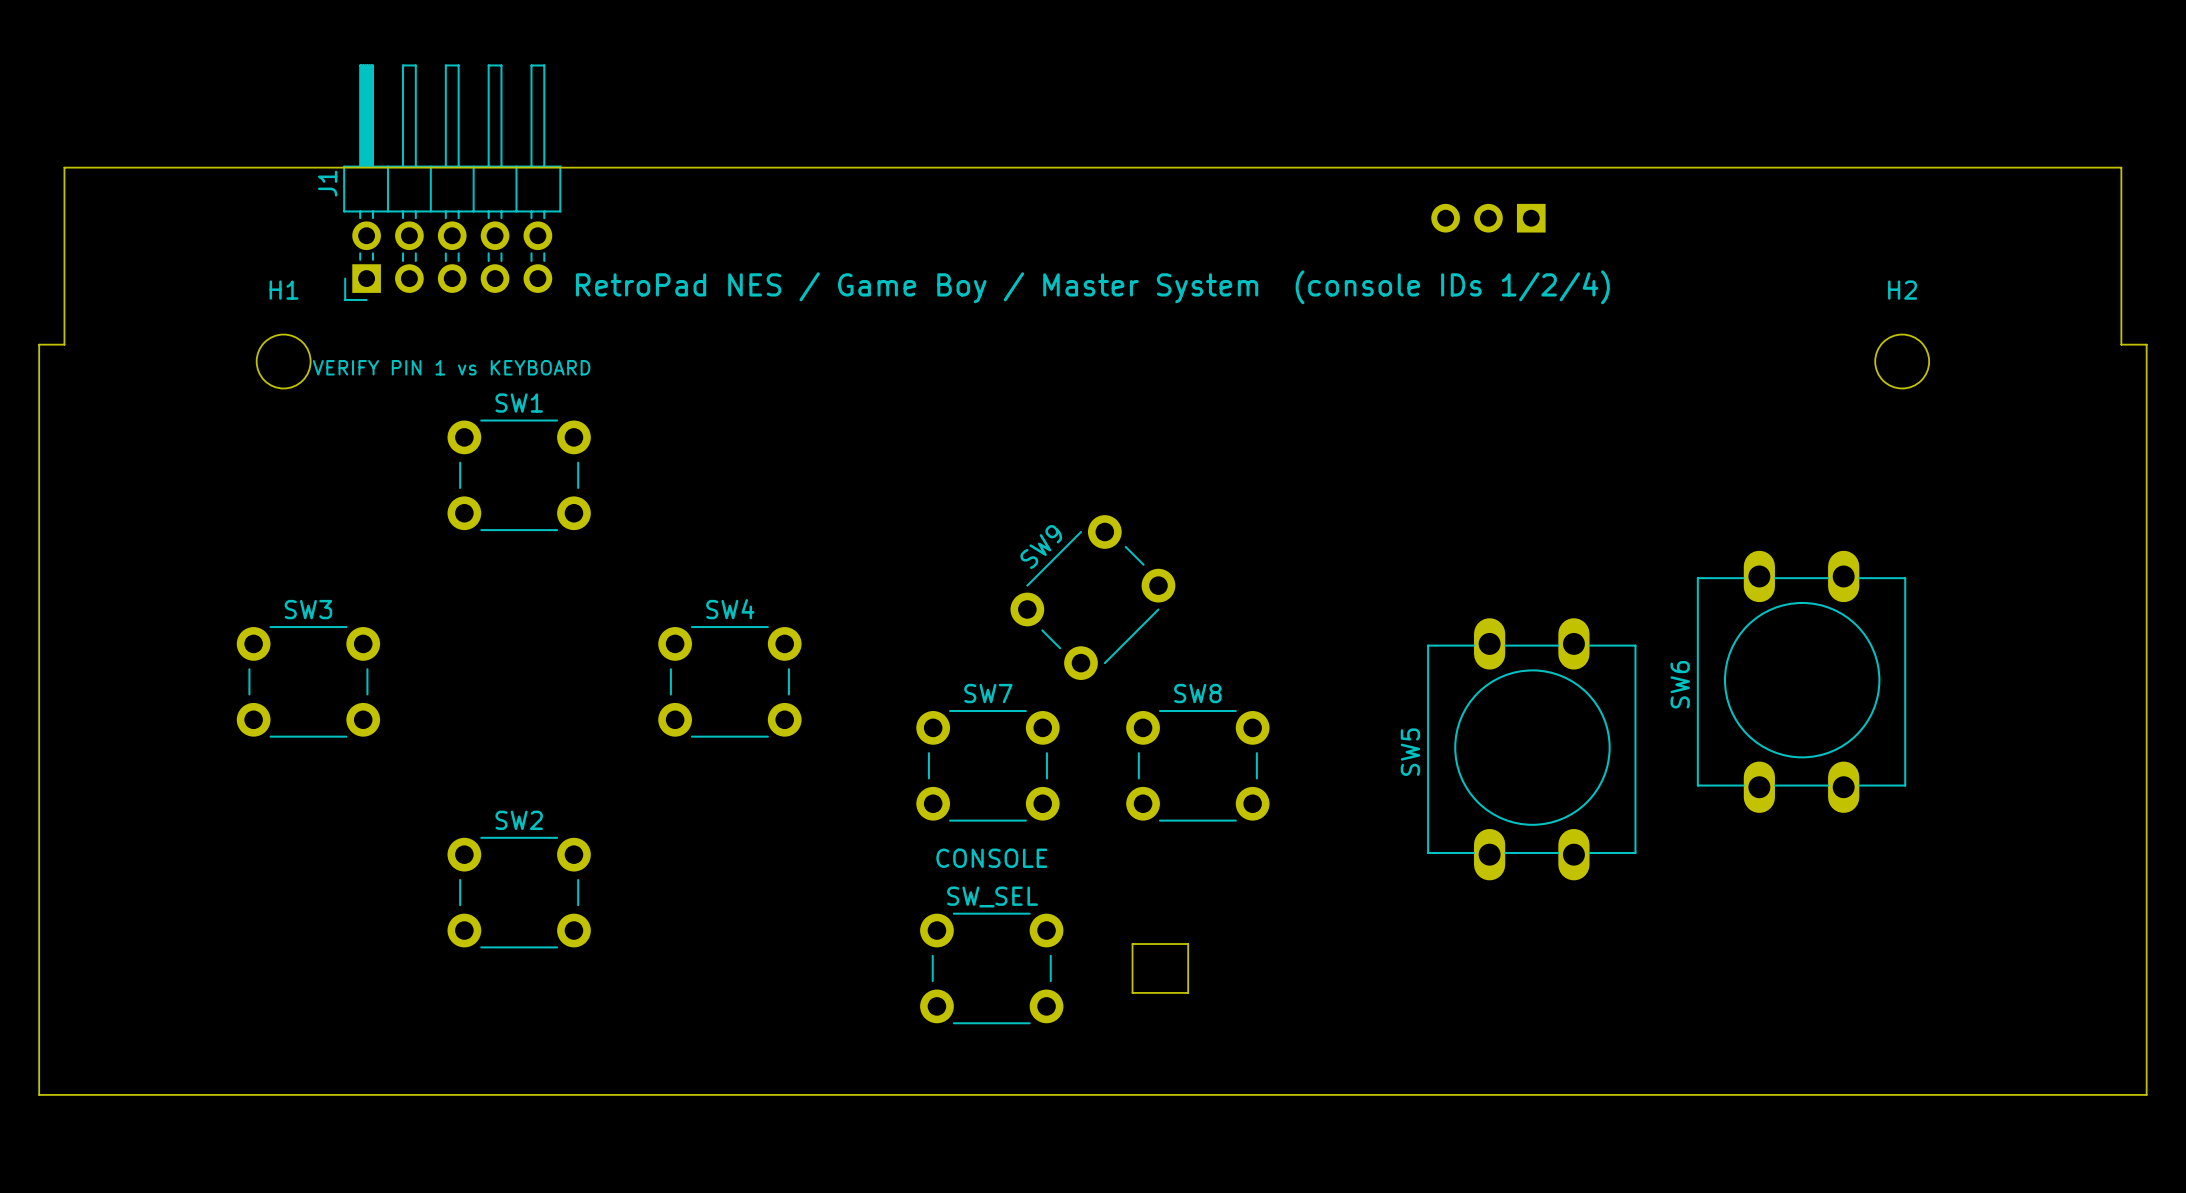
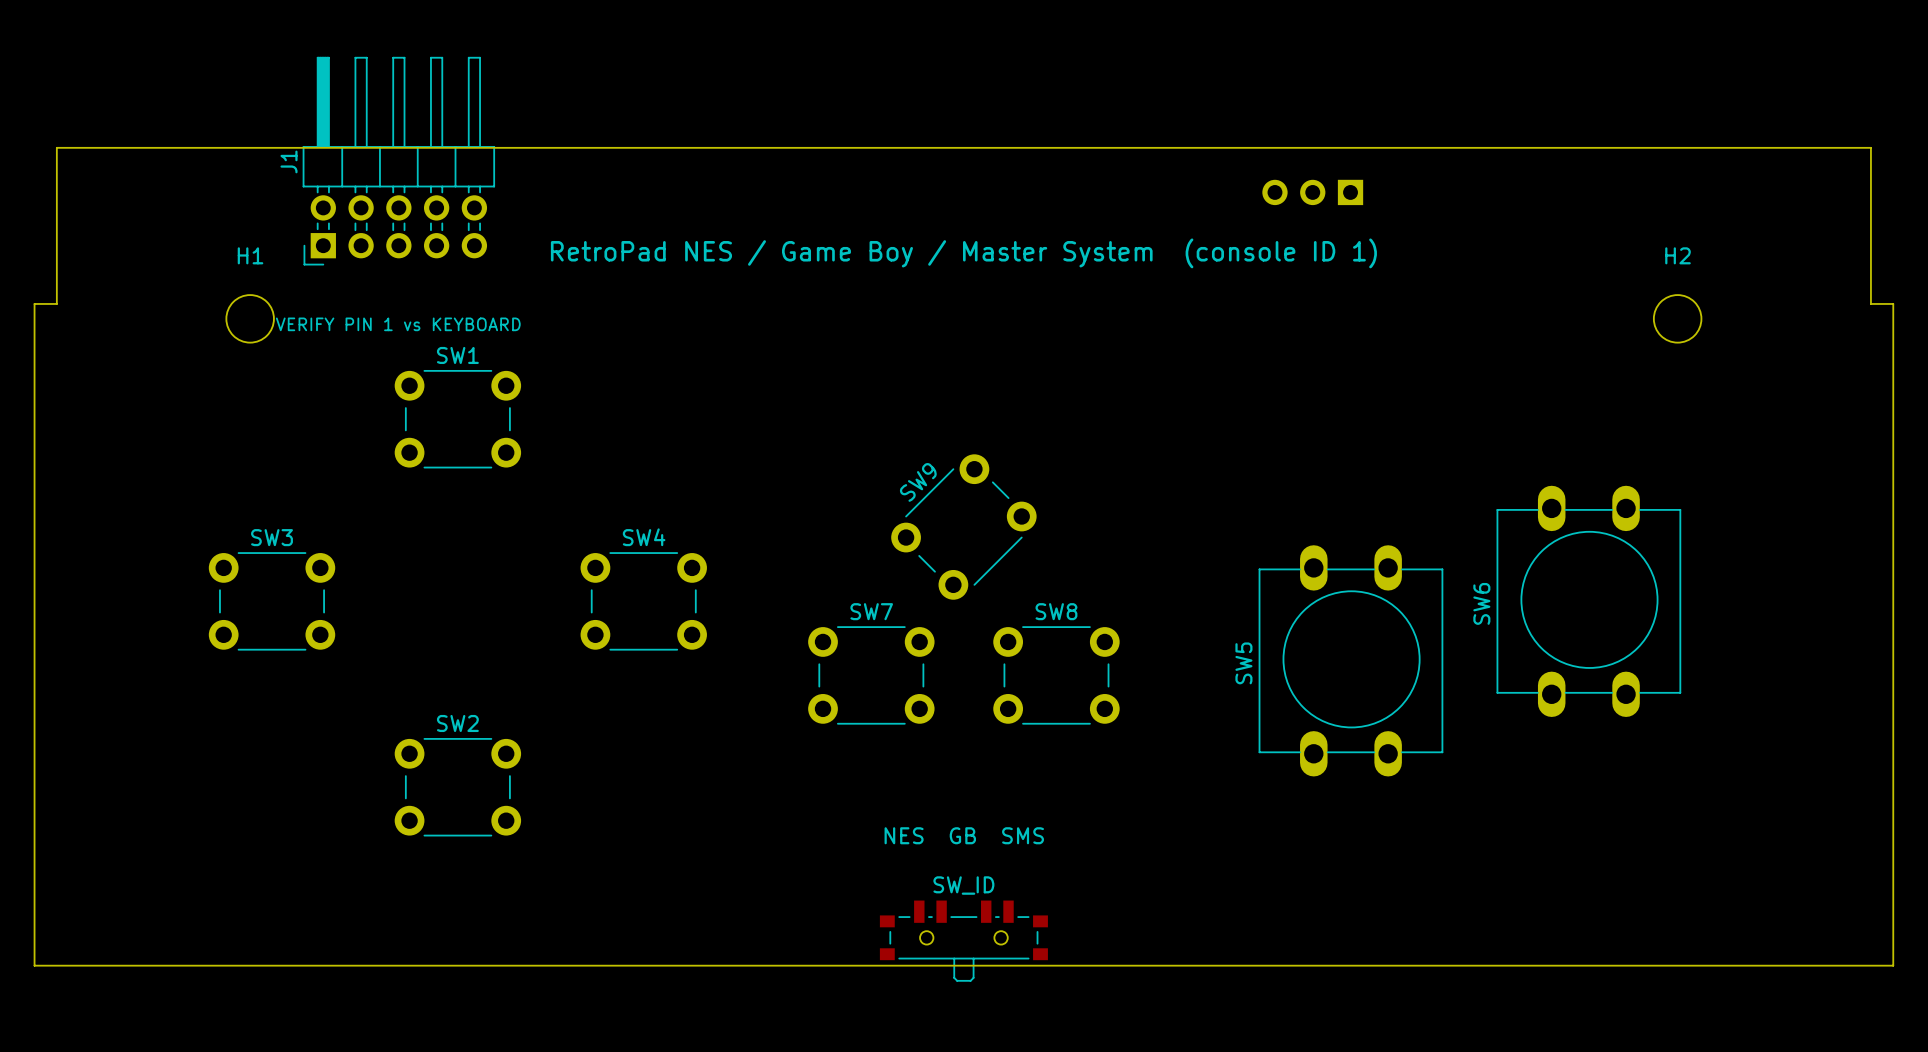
text: RetroPad NES / Game Boy / Master System (console IDs 1/2/4) (1092, 287) -> RetroPad NES / Game Boy / Master System (console ID 1) (963, 253)
text: CONSOLE (991, 858) -> none
text: none -> NES GB SMS (964, 835)
SW_SEL: (991, 968) -> none
part: (1160, 968) -> none
SW_ID: none -> (963, 941)

